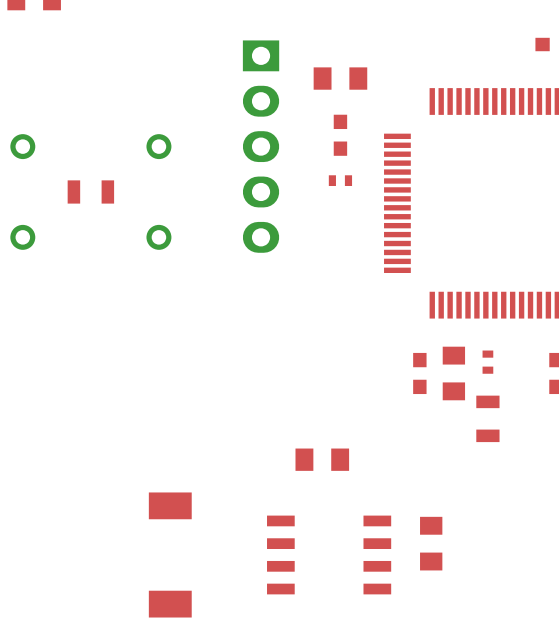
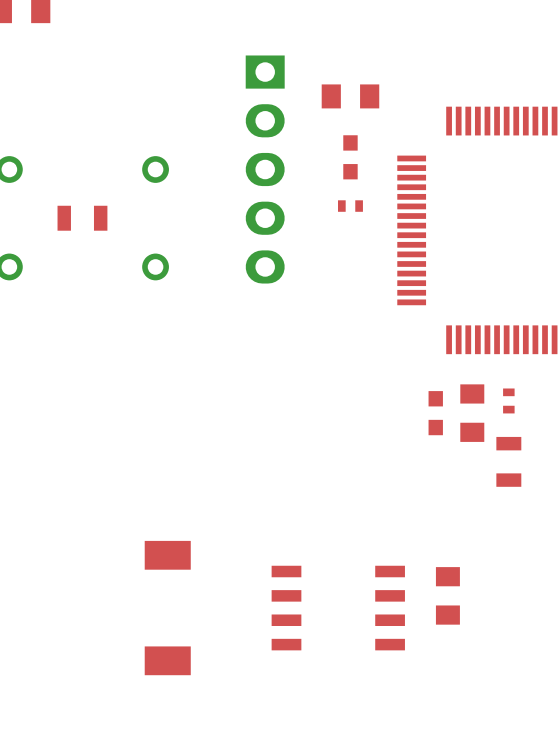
part: (322, 459) -> none

